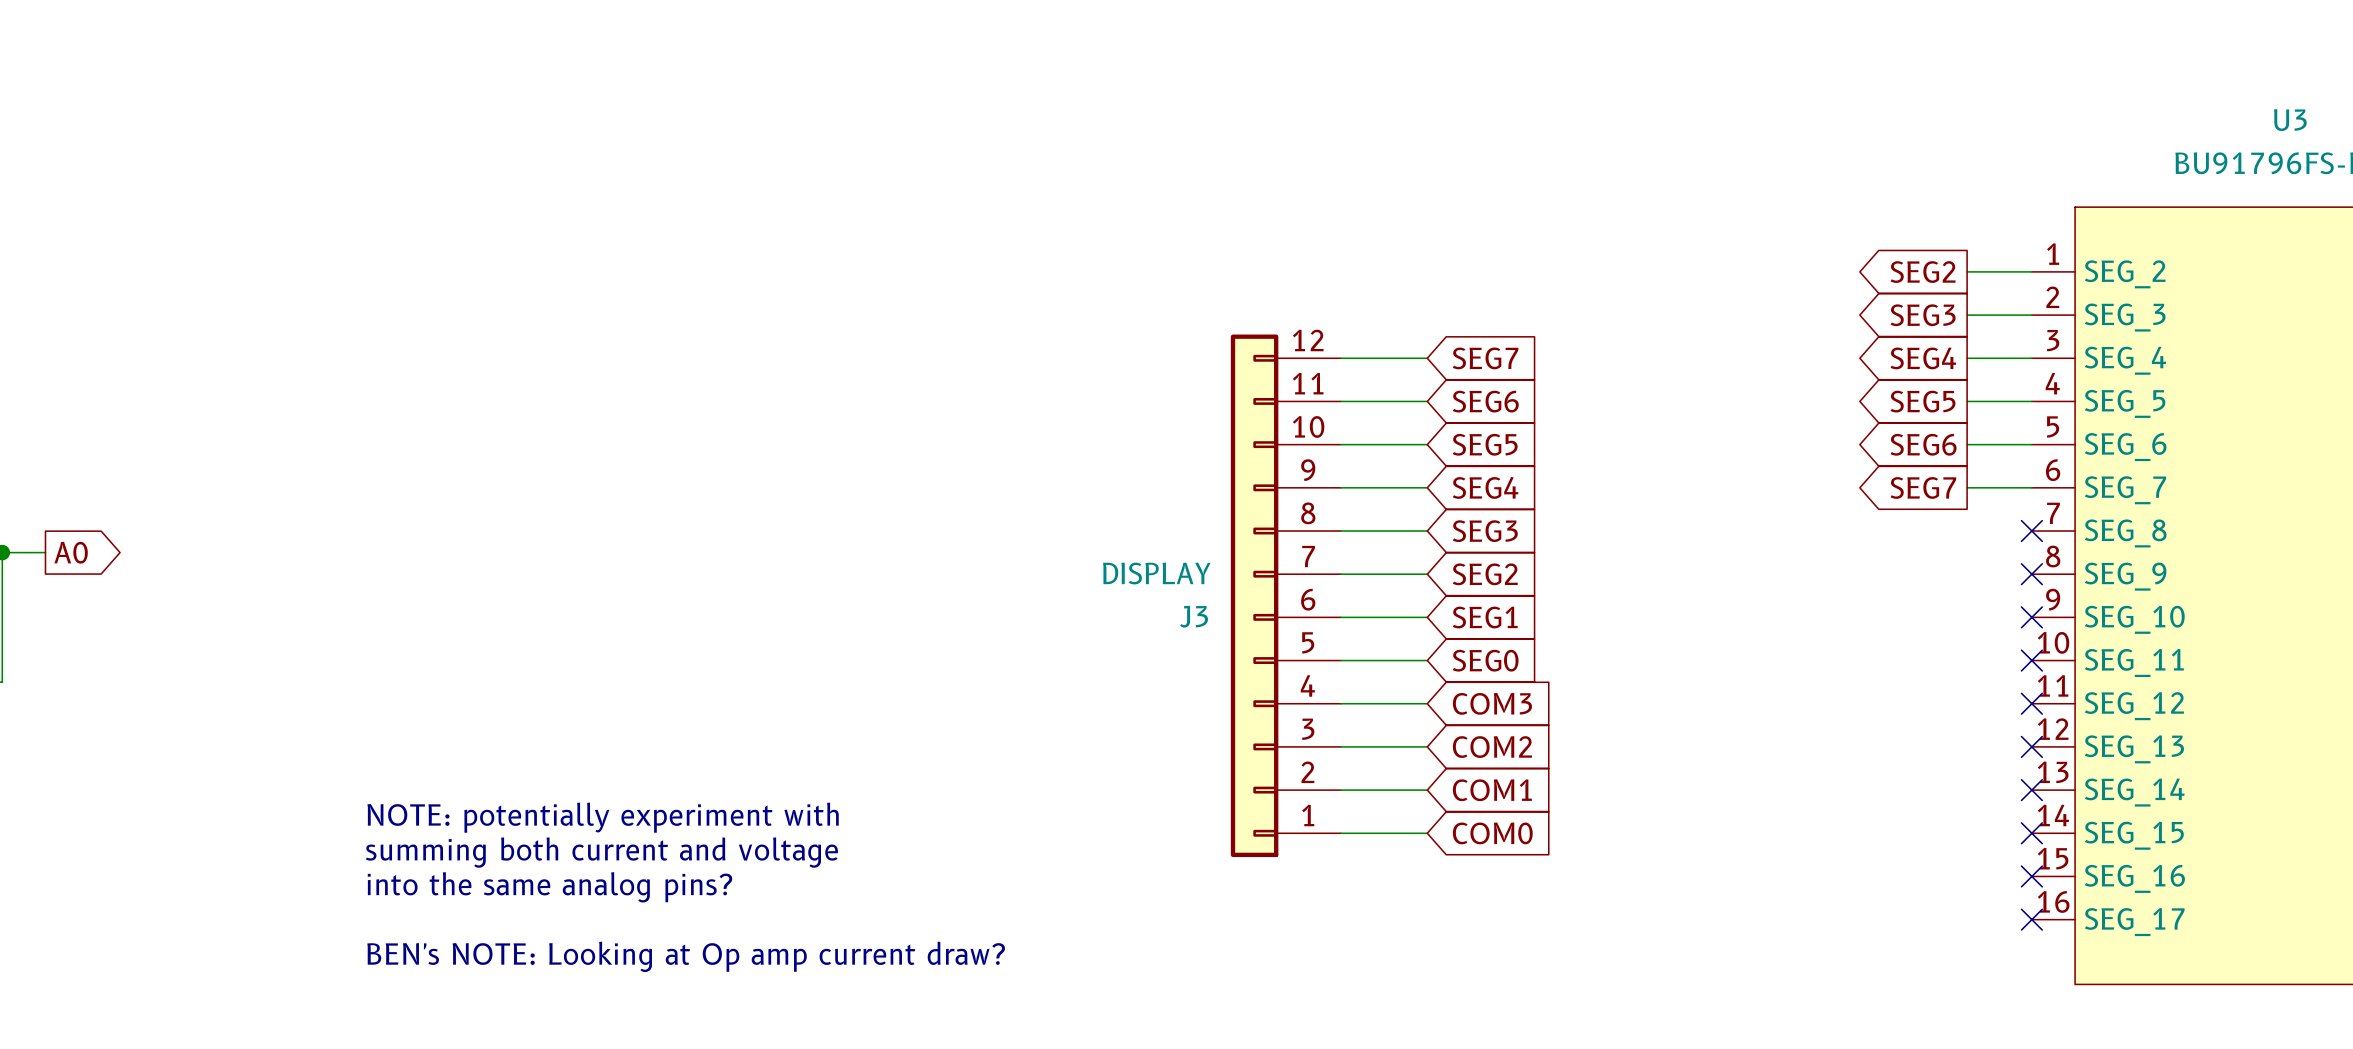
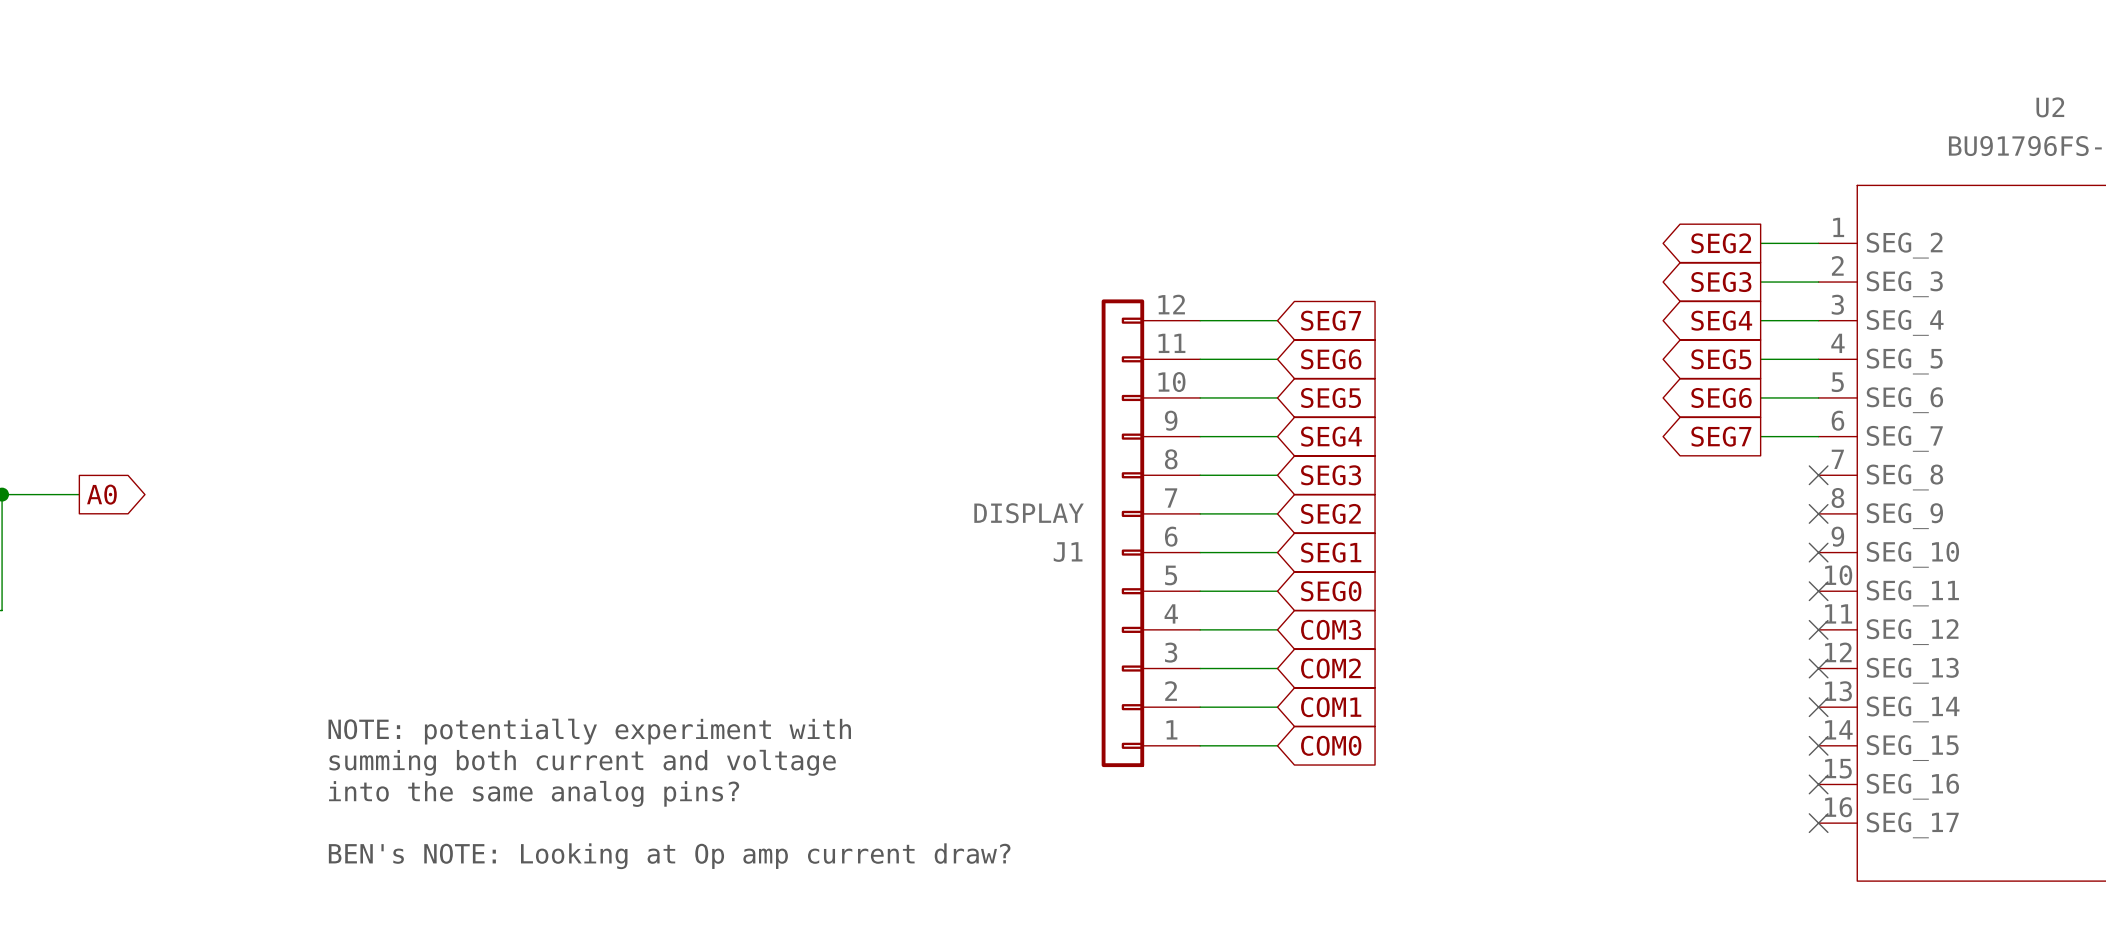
U3 name: U3 (2290, 120) -> U2 (2050, 107)
wire: none -> (40, 494) (79, 494)
global label position: A0 (71, 552) -> A0 (101, 494)
J3 name: J3 (1194, 616) -> J1 (1068, 552)

